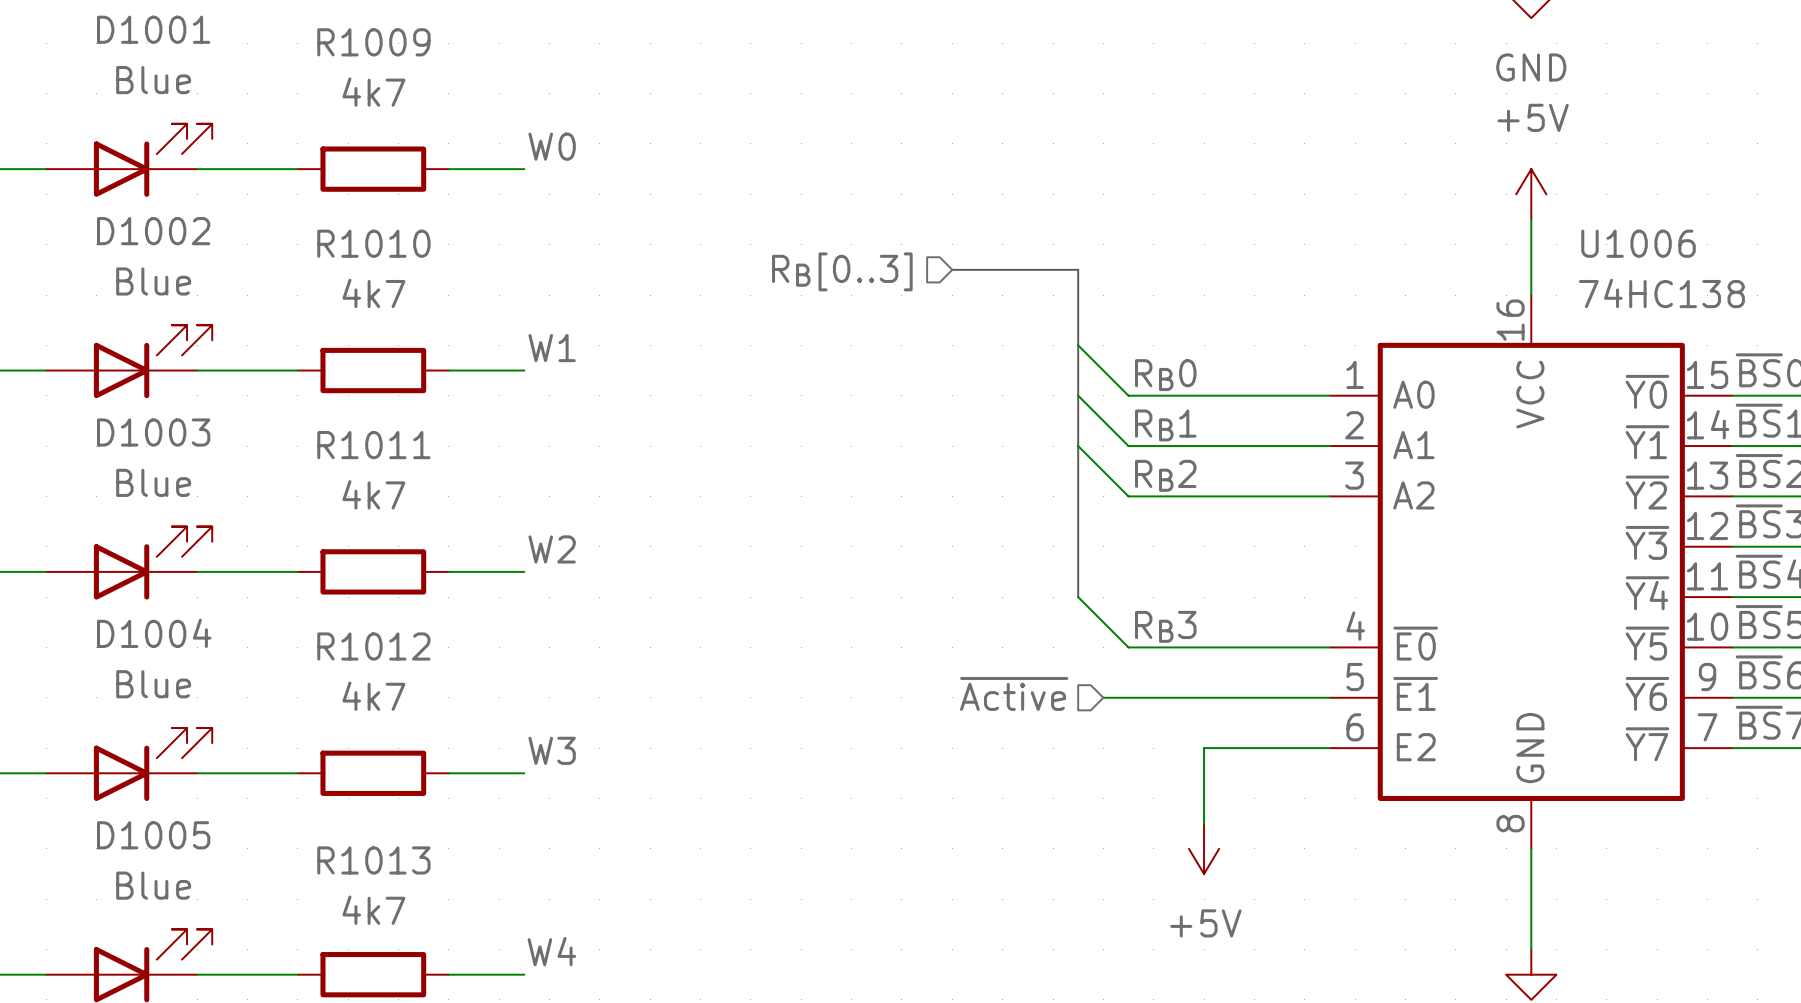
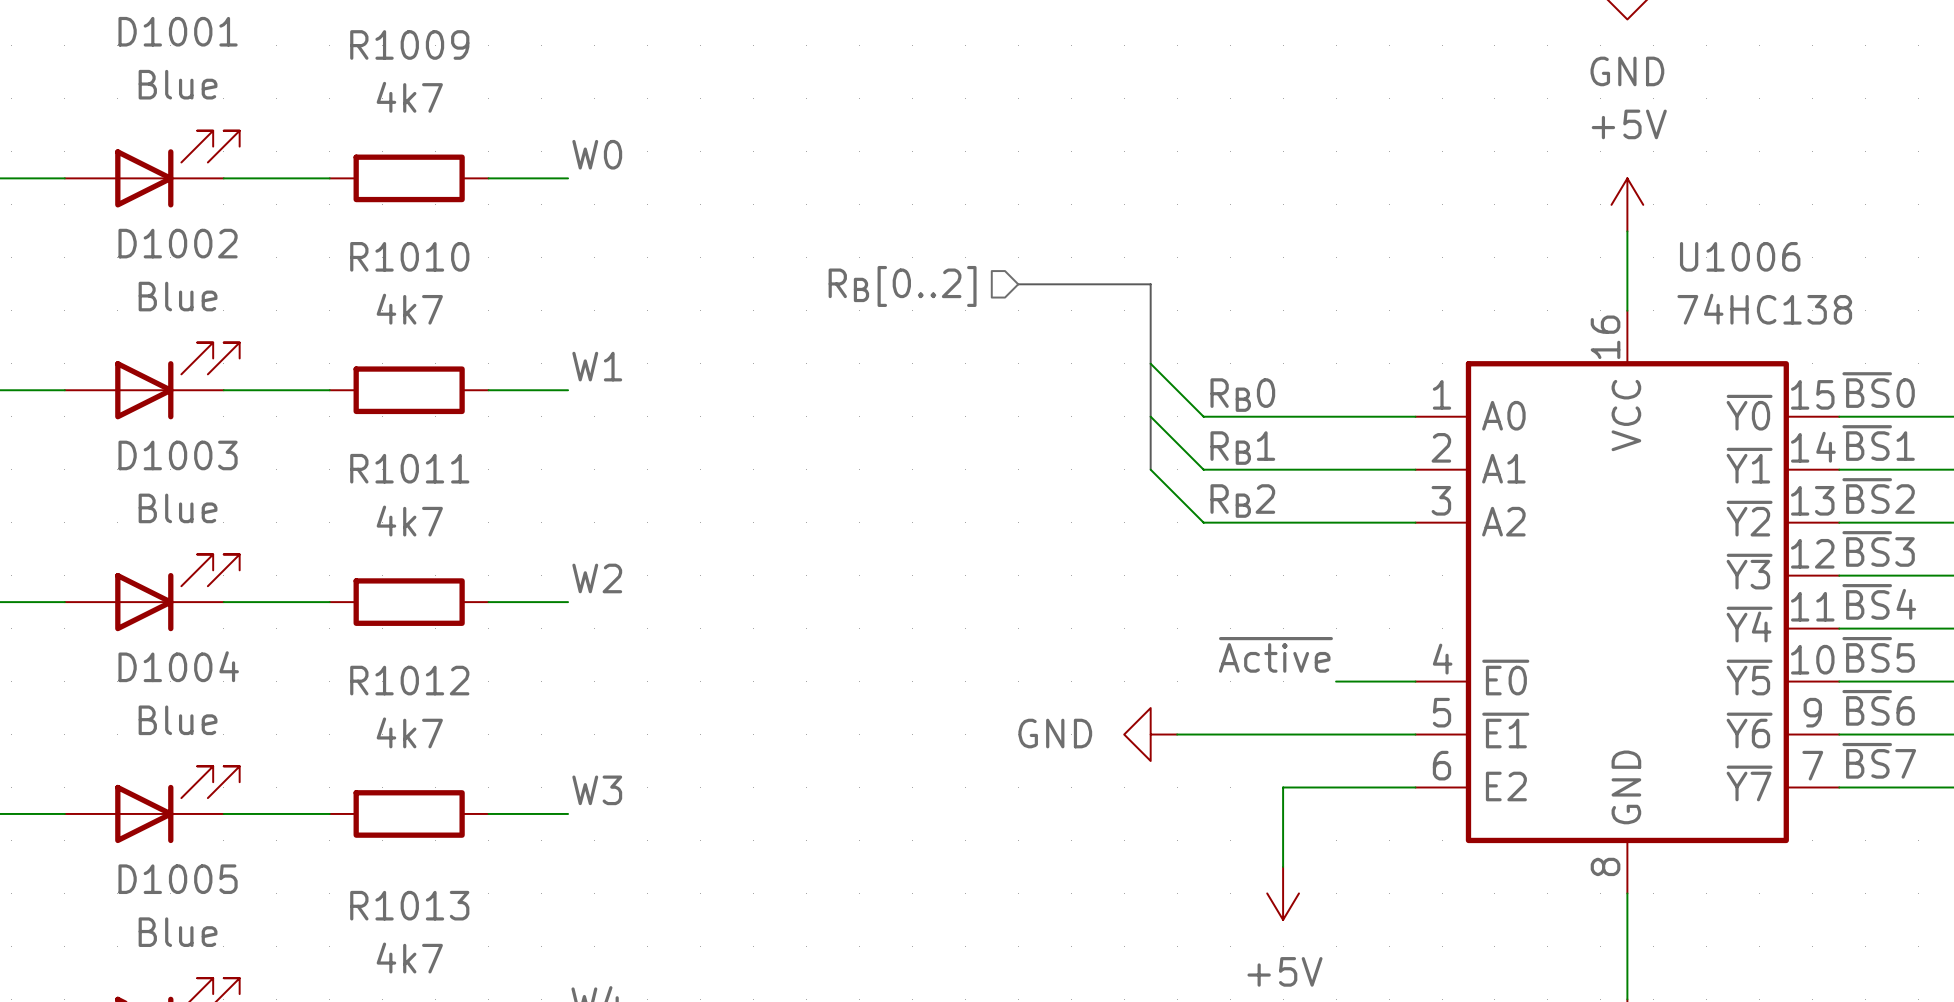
hierarchical label: RB[0..3] (842, 271) -> RB[0..2] (902, 286)
bus: (1078, 446) (1078, 597) -> none
wire: (1078, 597) (1128, 647) (1254, 647) -> none
label: none -> ~{Active} (1275, 654)
label: RB3 (1165, 626) -> none
hierarchical label: ~{Active} (1014, 693) -> none
power symbol: none -> GND (1150, 734)

